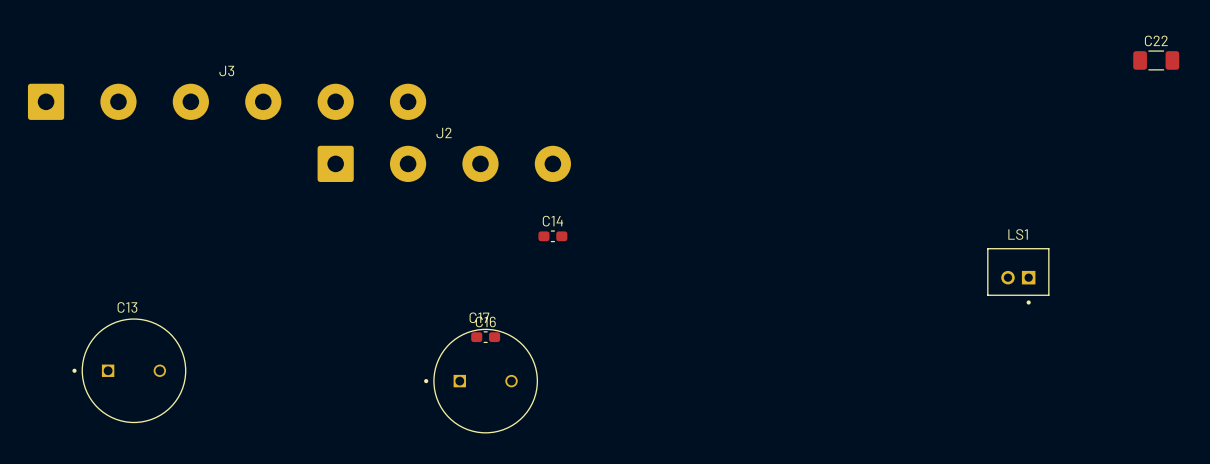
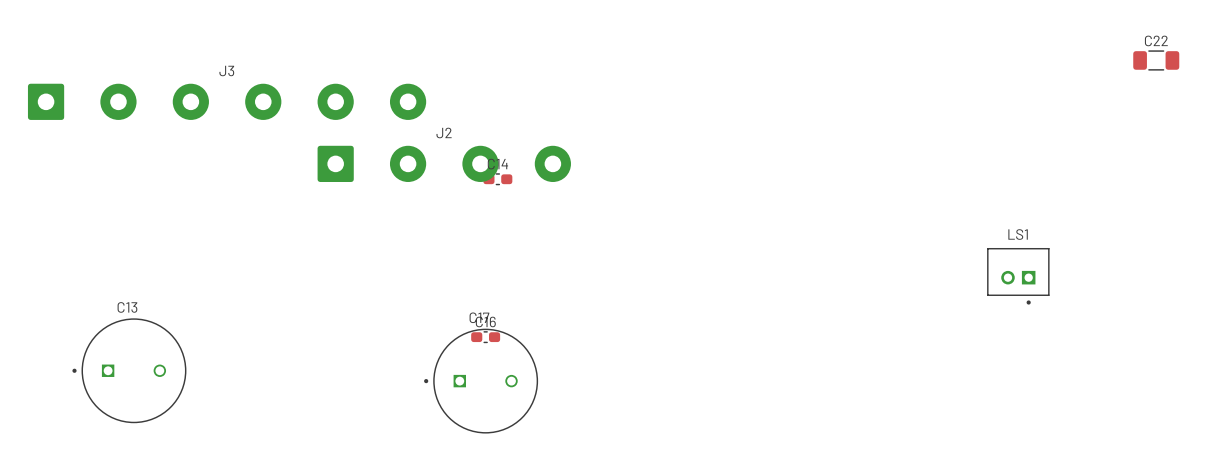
C14 position: (552, 236) -> (497, 179)

